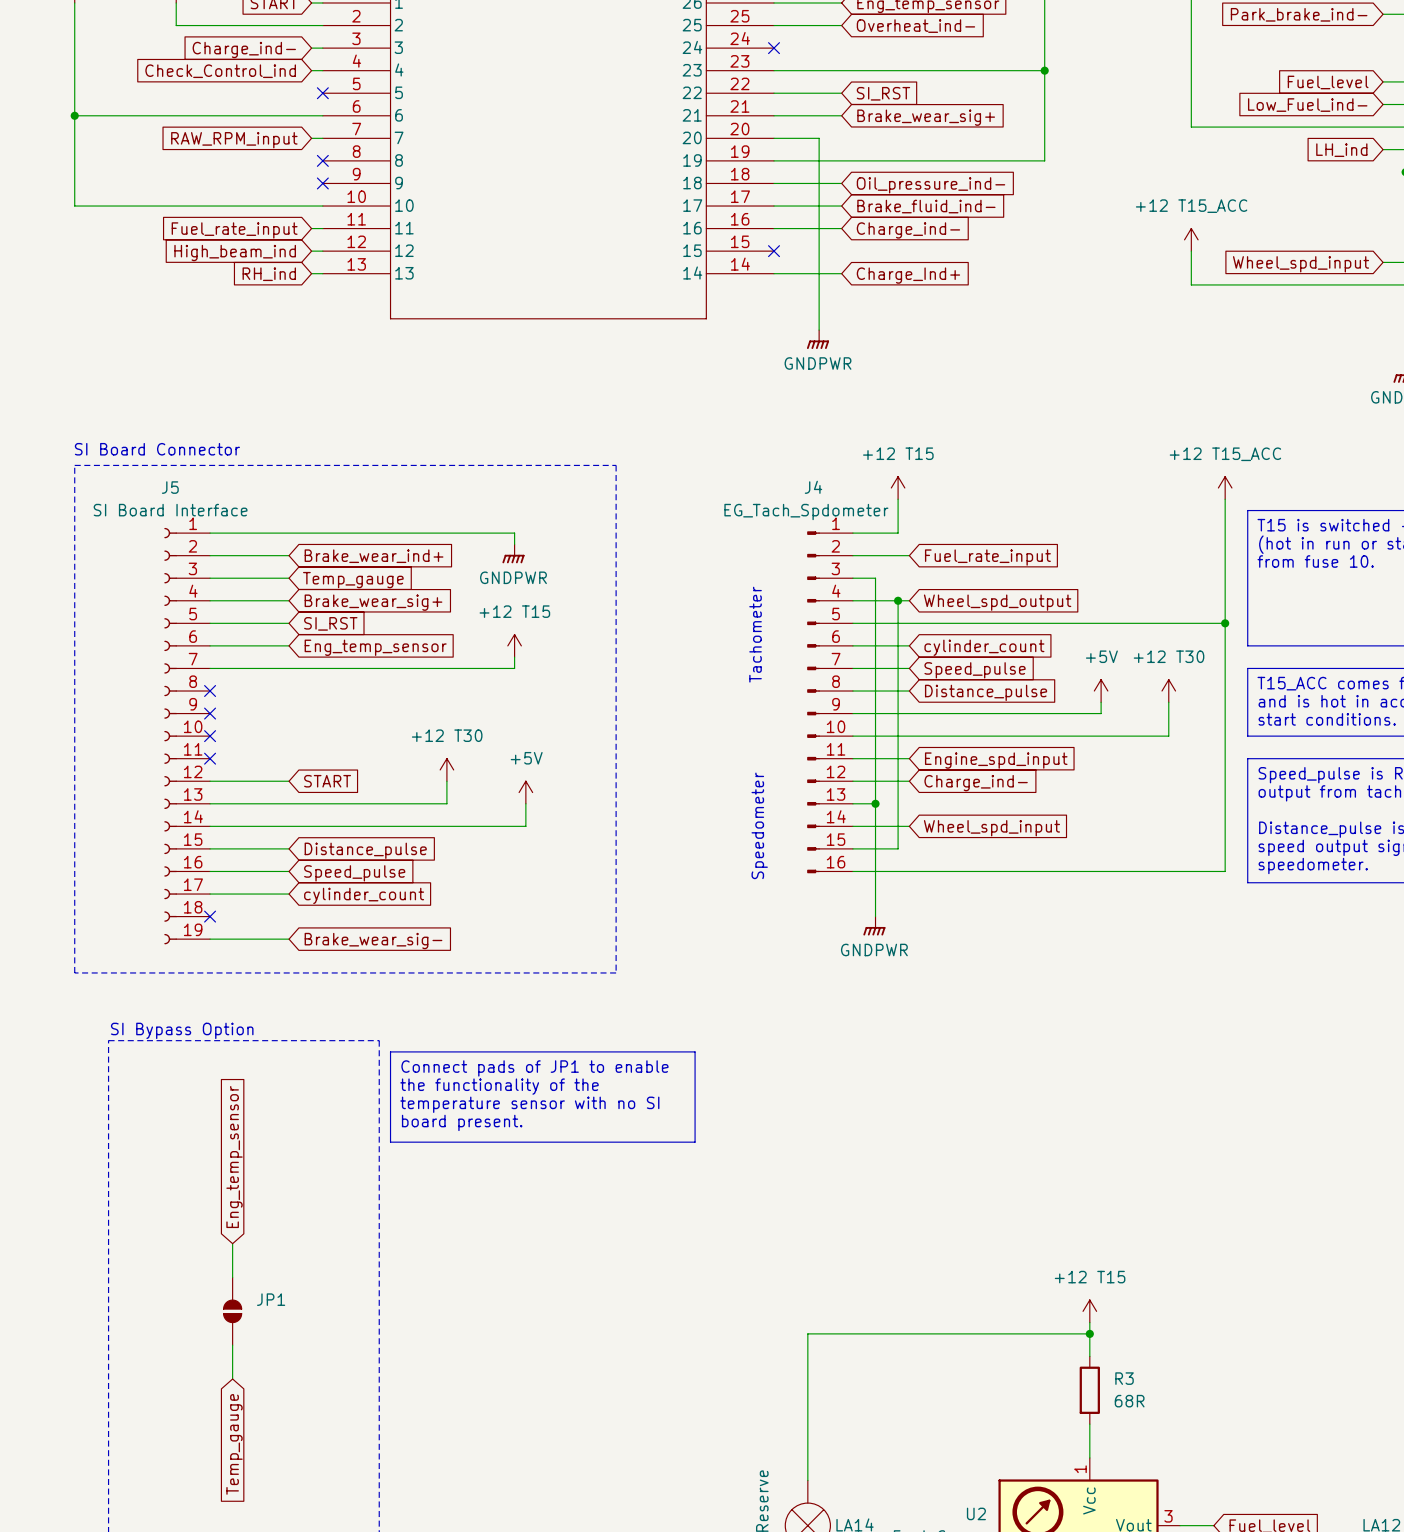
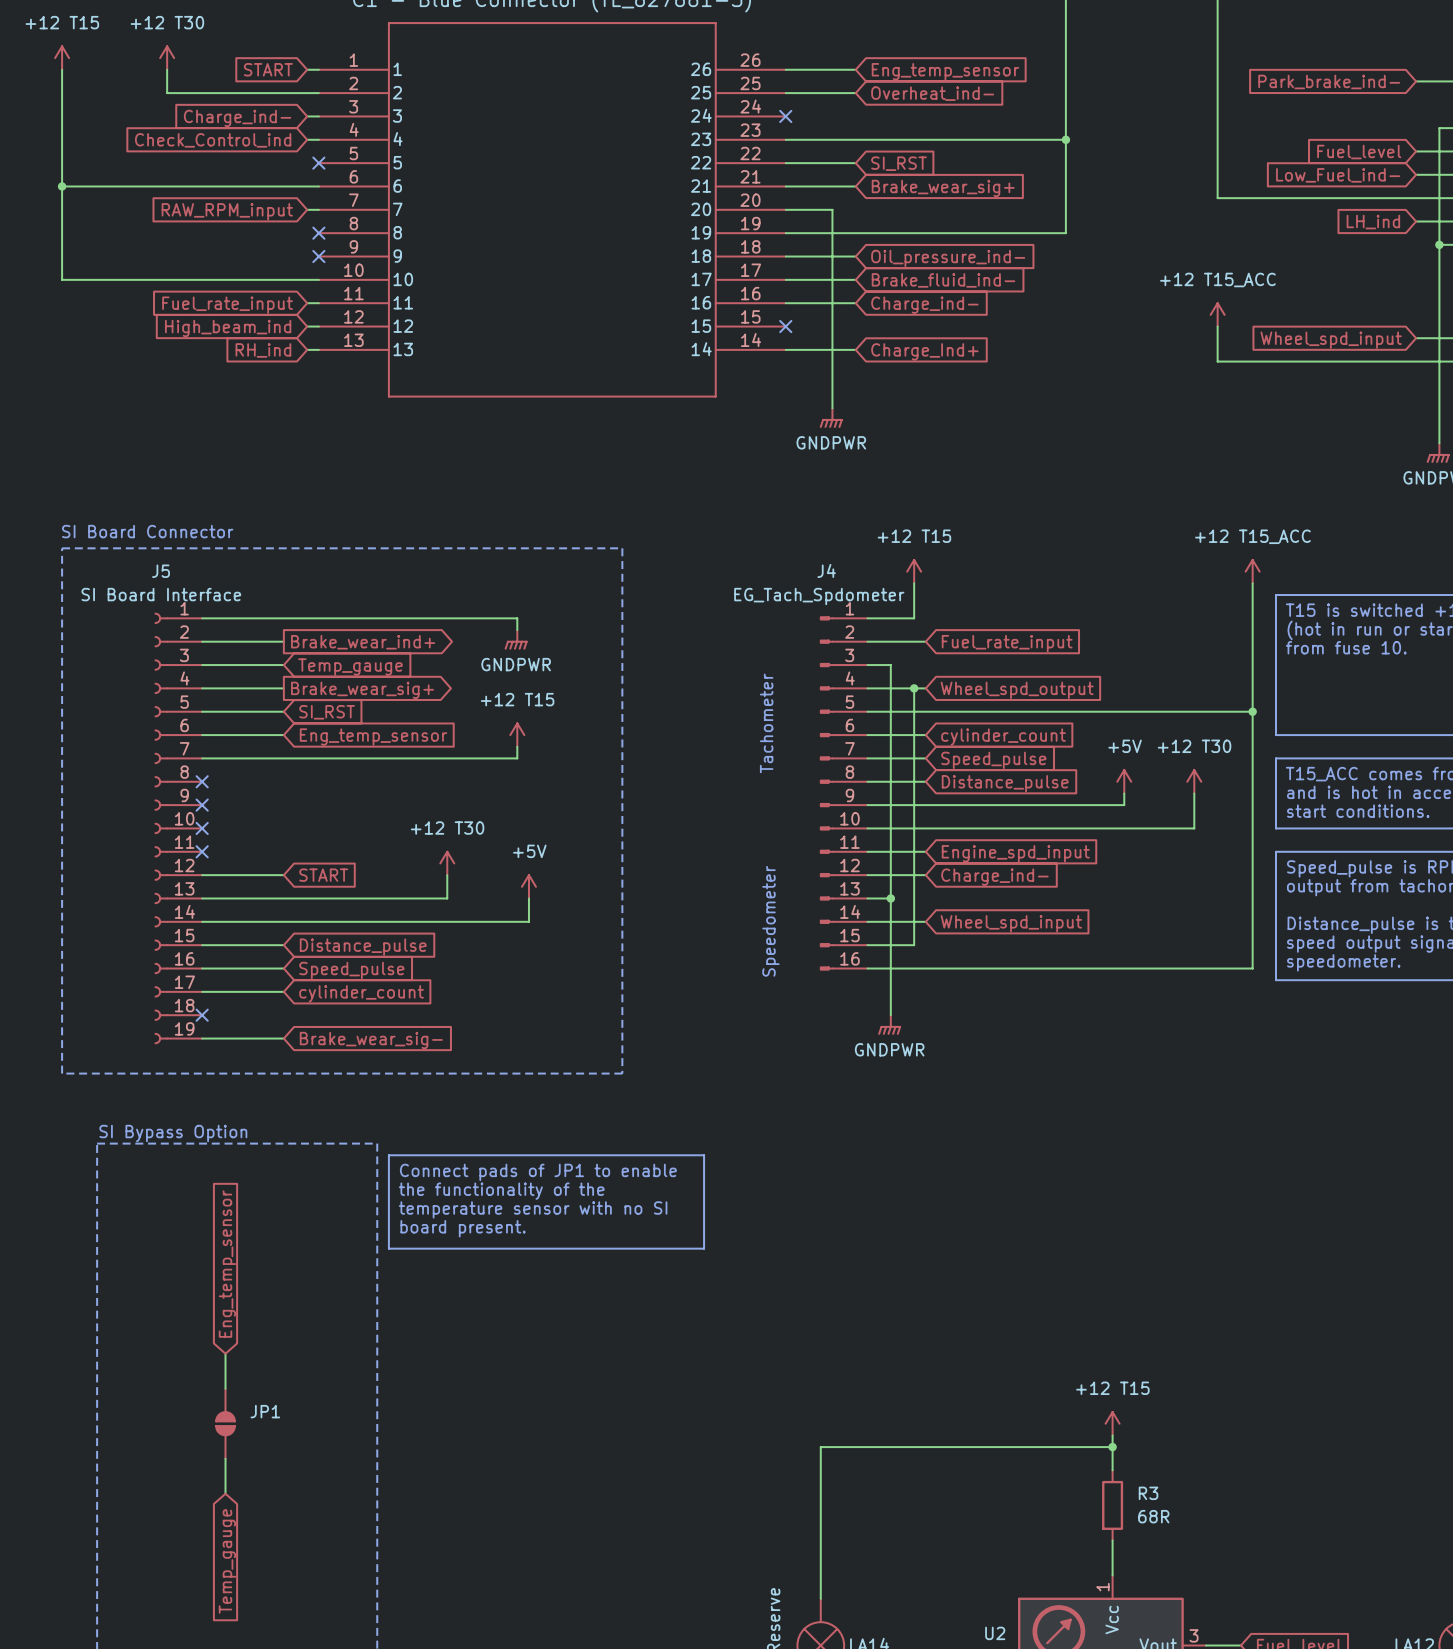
global label shape: input (374, 556) -> output (363, 642)
global label shape: input (373, 602) -> output (362, 690)

